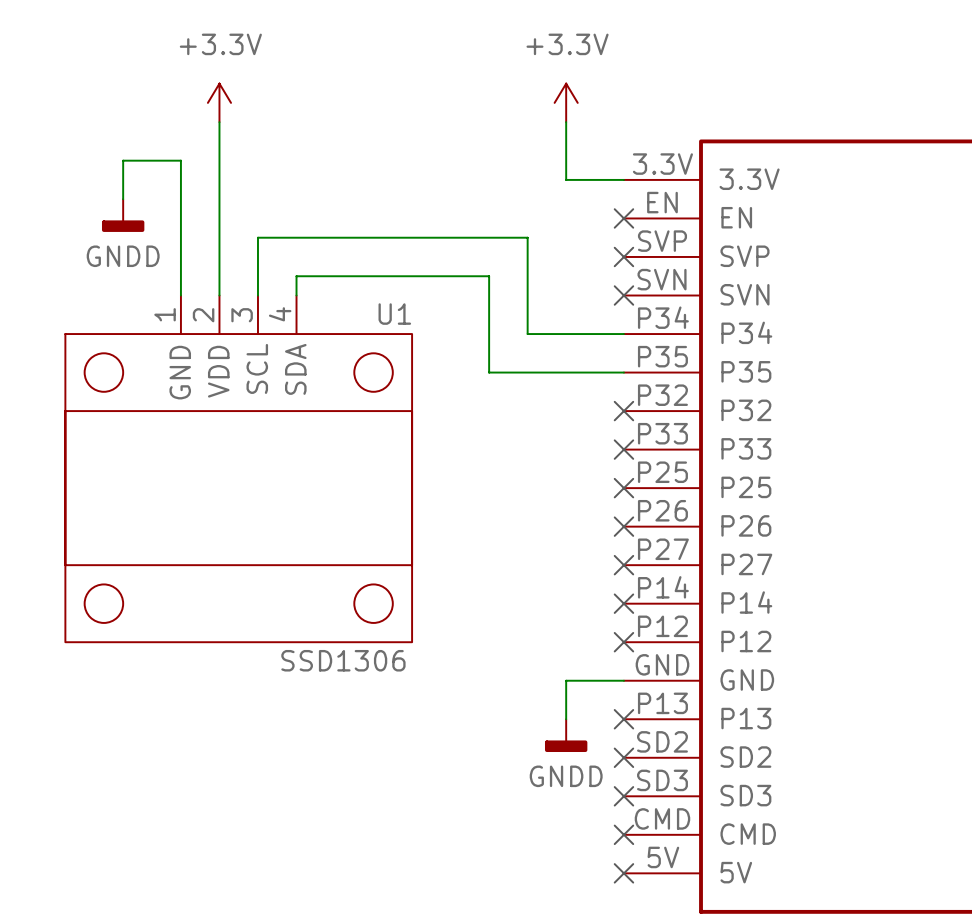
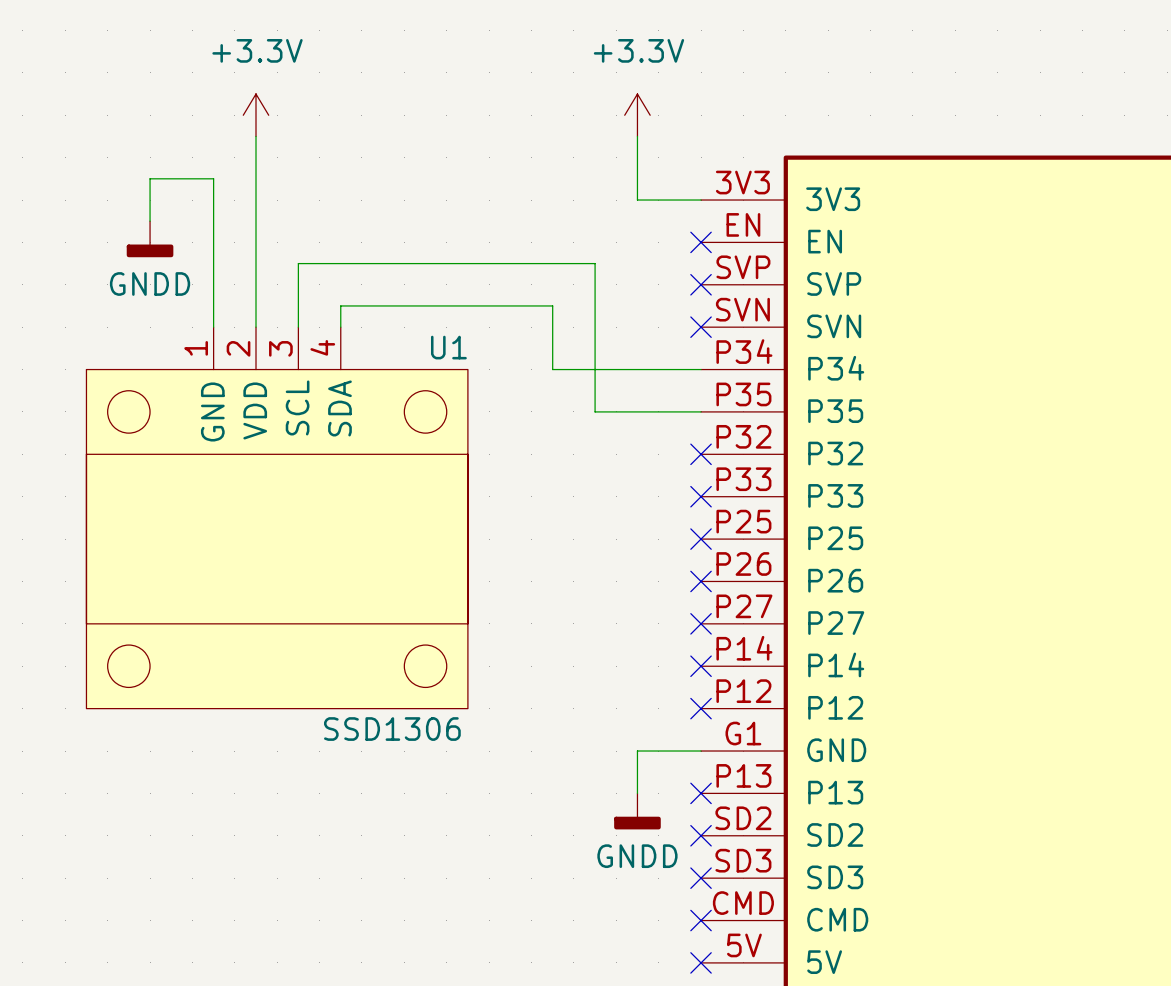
part pin number: 3.3V (662, 164) -> 3V3 (742, 182)
part pin name: 3.3V (749, 179) -> 3V3 (833, 199)
wire: (489, 334) (489, 372) (527, 372) -> (552, 369) (595, 369) (595, 411)
part pin number: GND (662, 664) -> G1 (743, 733)

